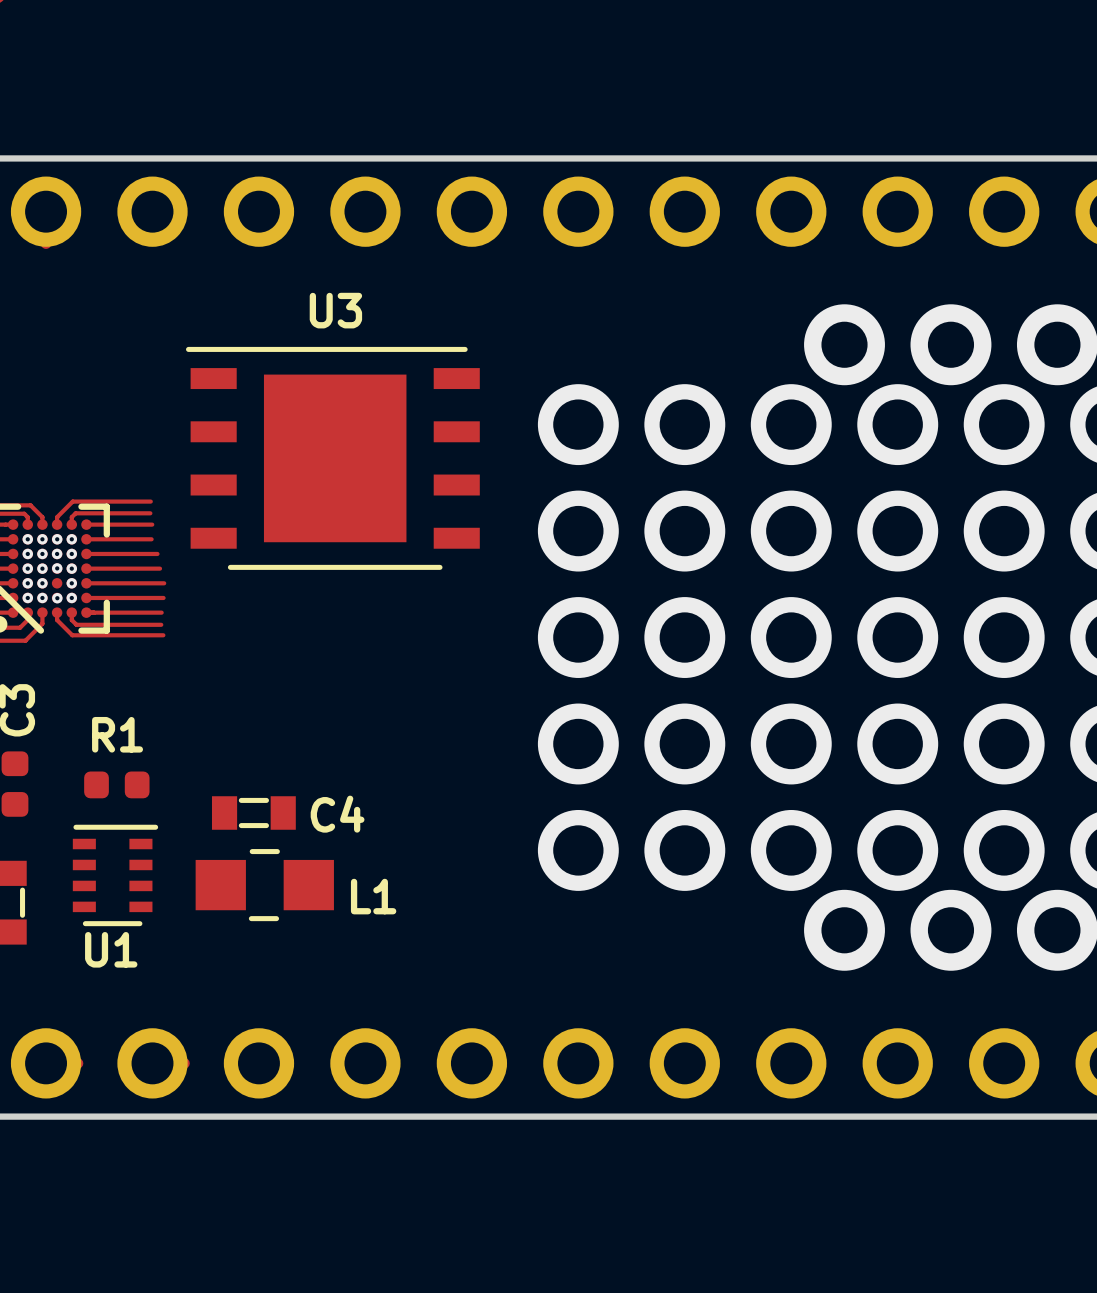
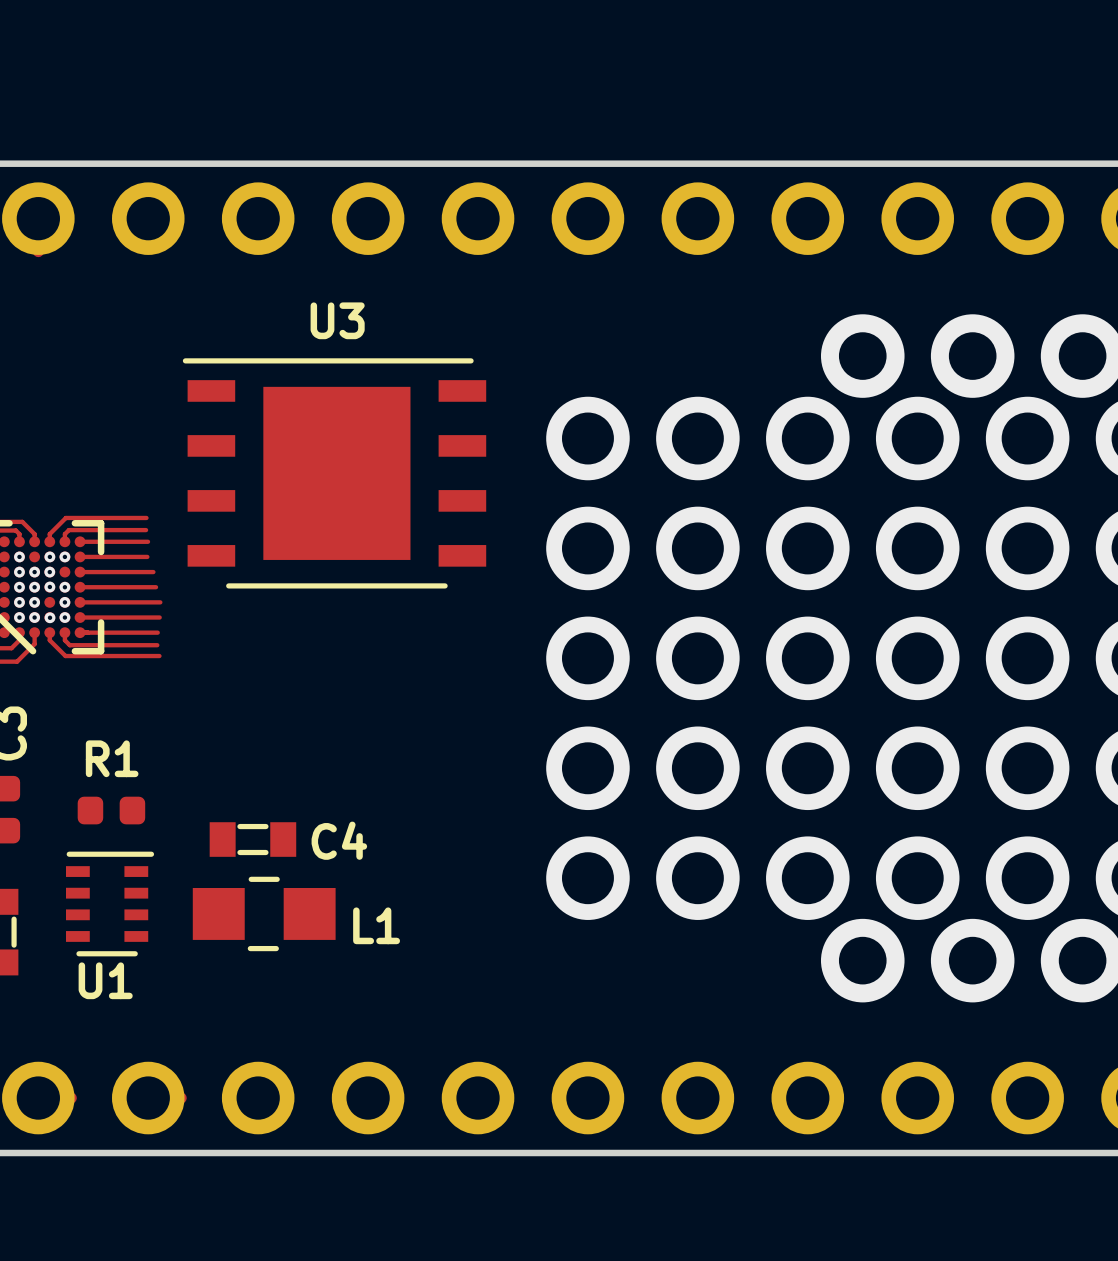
via: (42, 539) -> none
via: (71, 553) -> none

